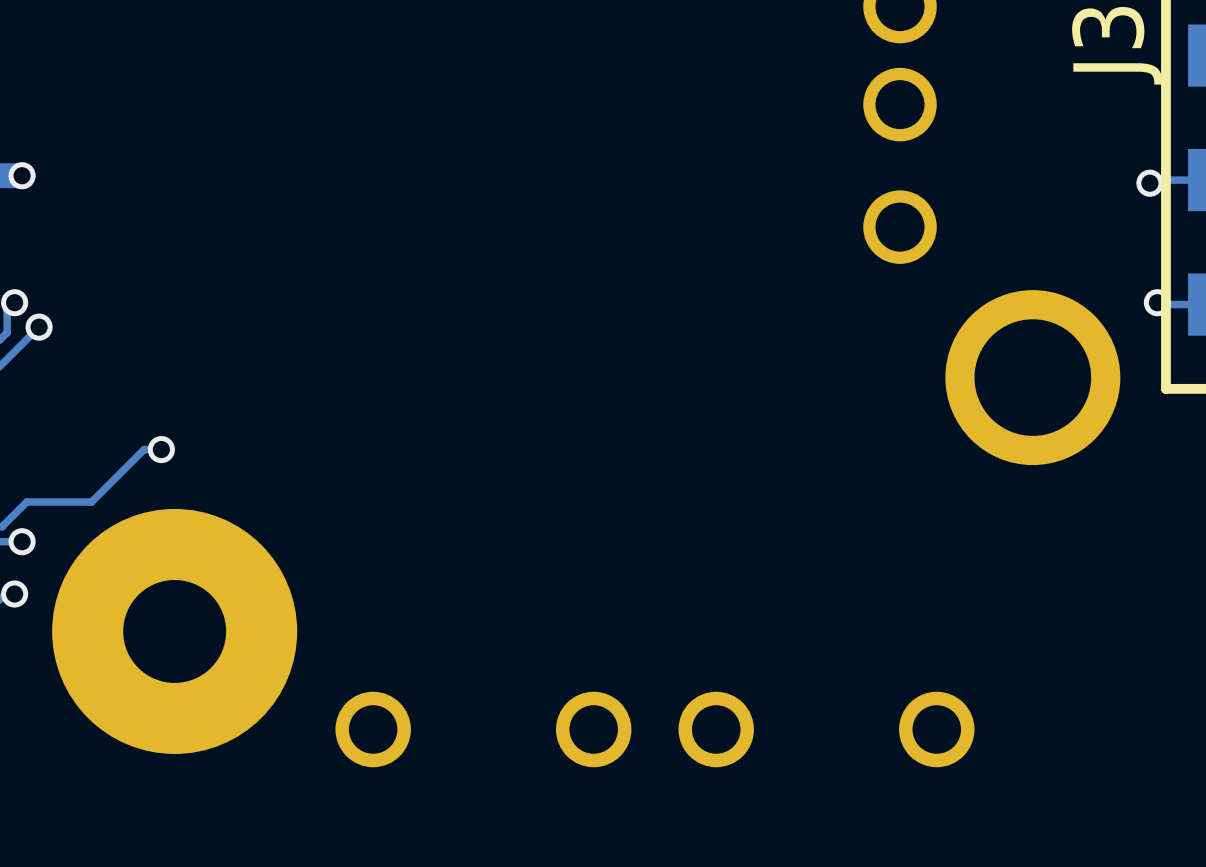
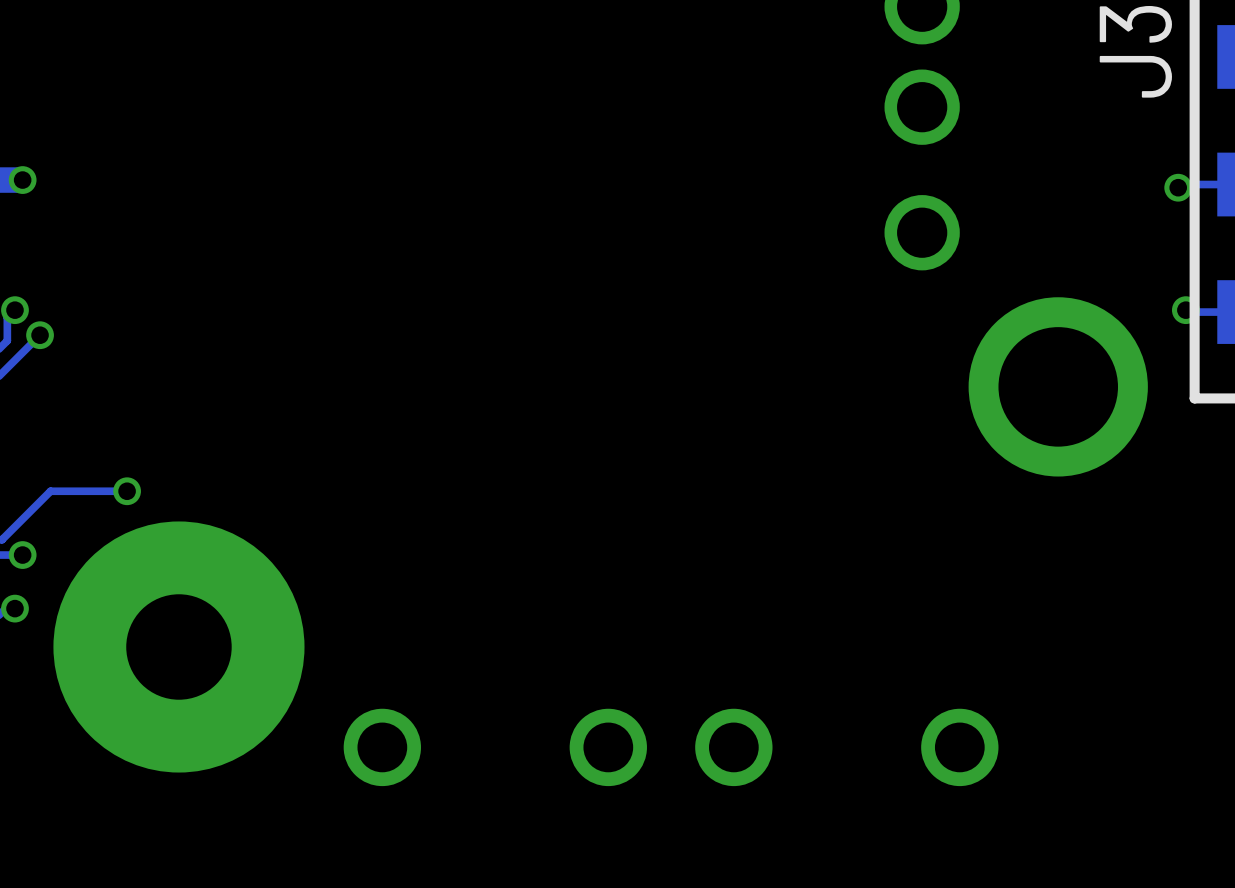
track: (161, 449) (144, 449) (91, 502) (26, 502) -> (127, 491) (50, 491) (27, 514)
via position: (161, 449) -> (127, 491)

